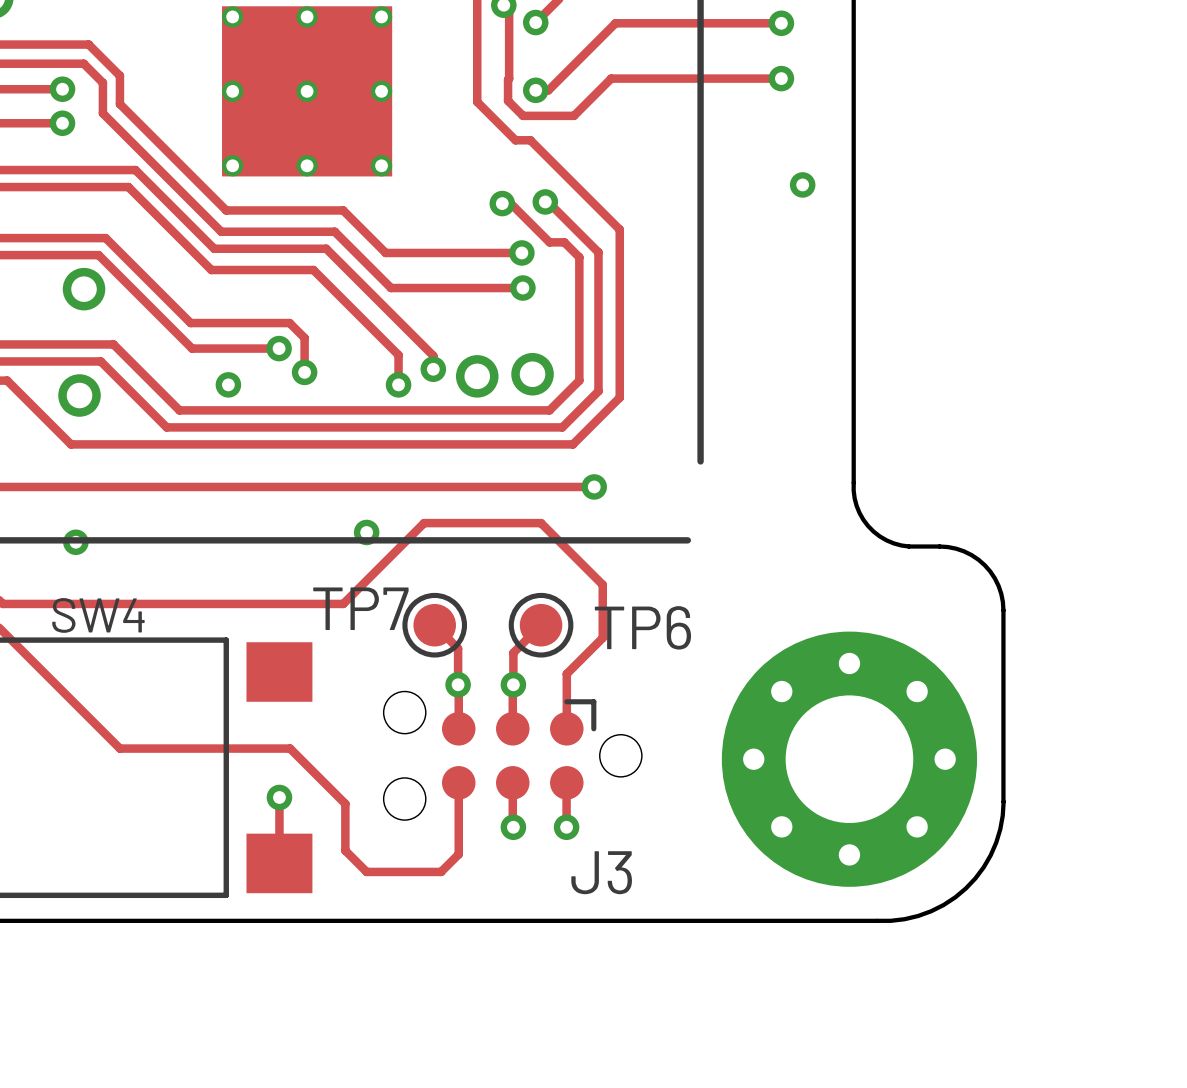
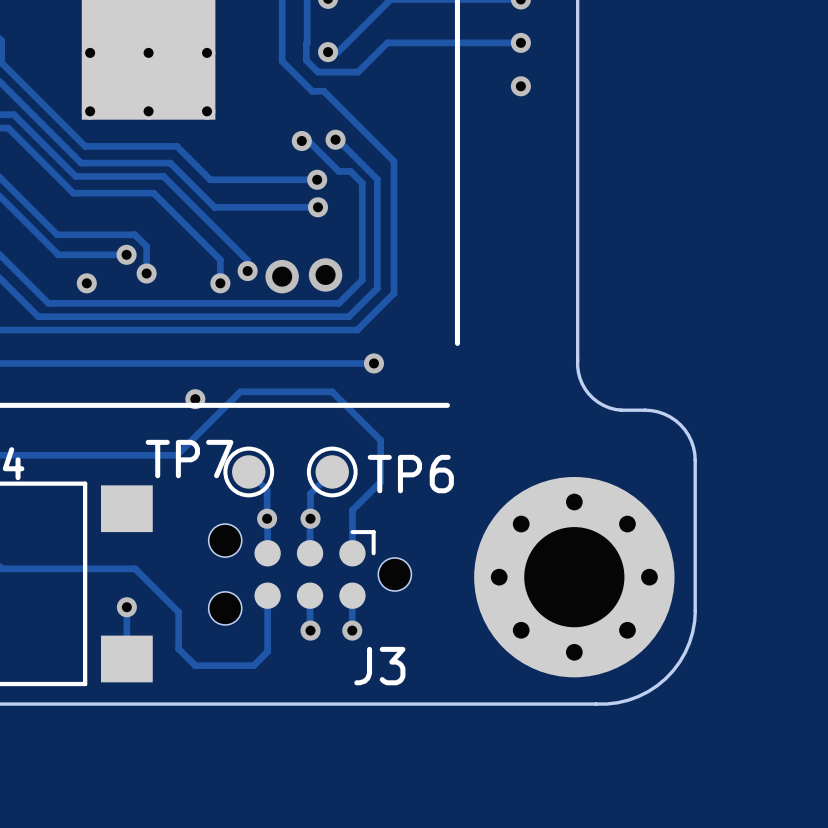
via position: (802, 184) -> (520, 86)

